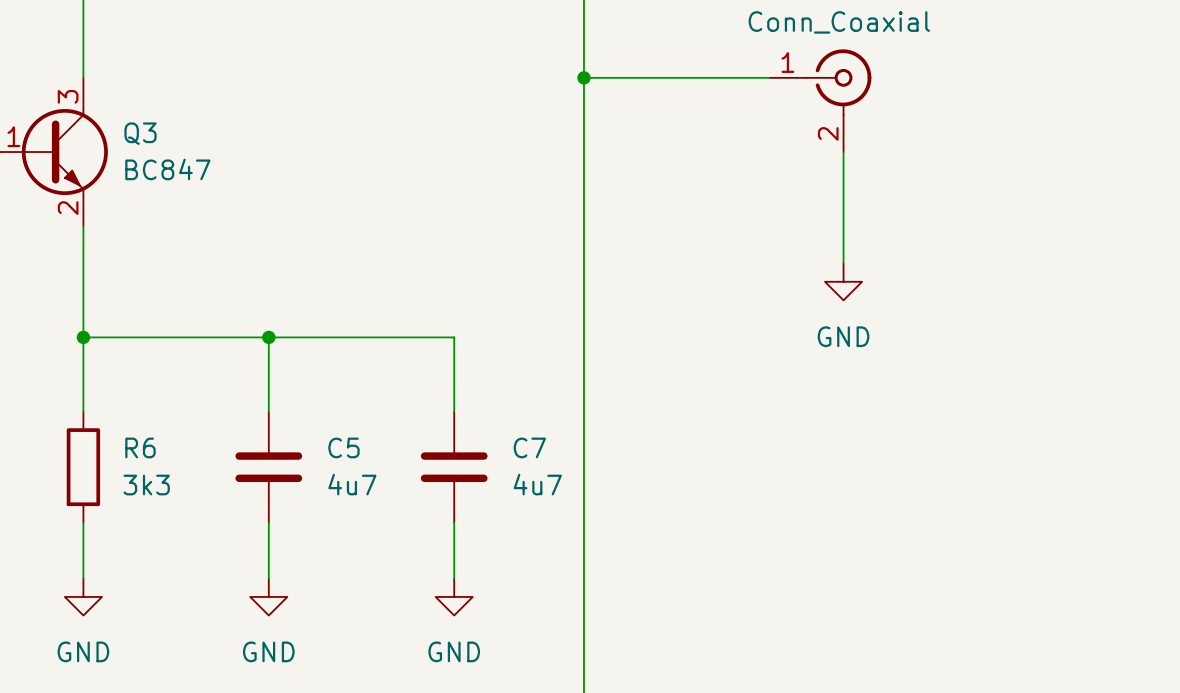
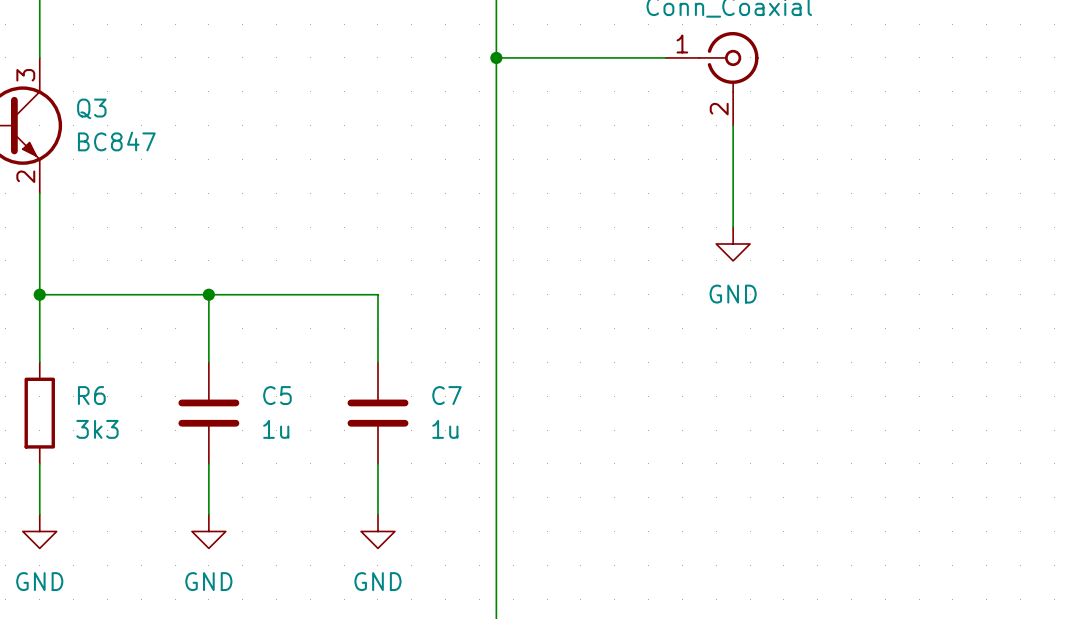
C5 value: 4u7 (352, 484) -> 1u (276, 429)
C7 value: 4u7 (537, 484) -> 1u (445, 429)

